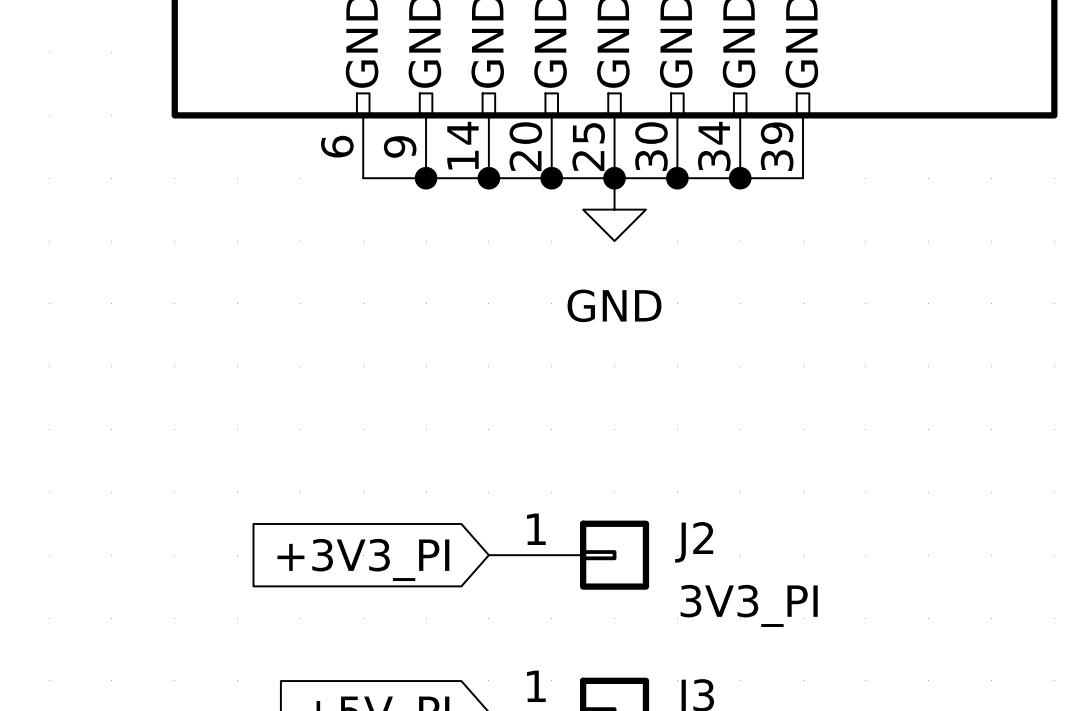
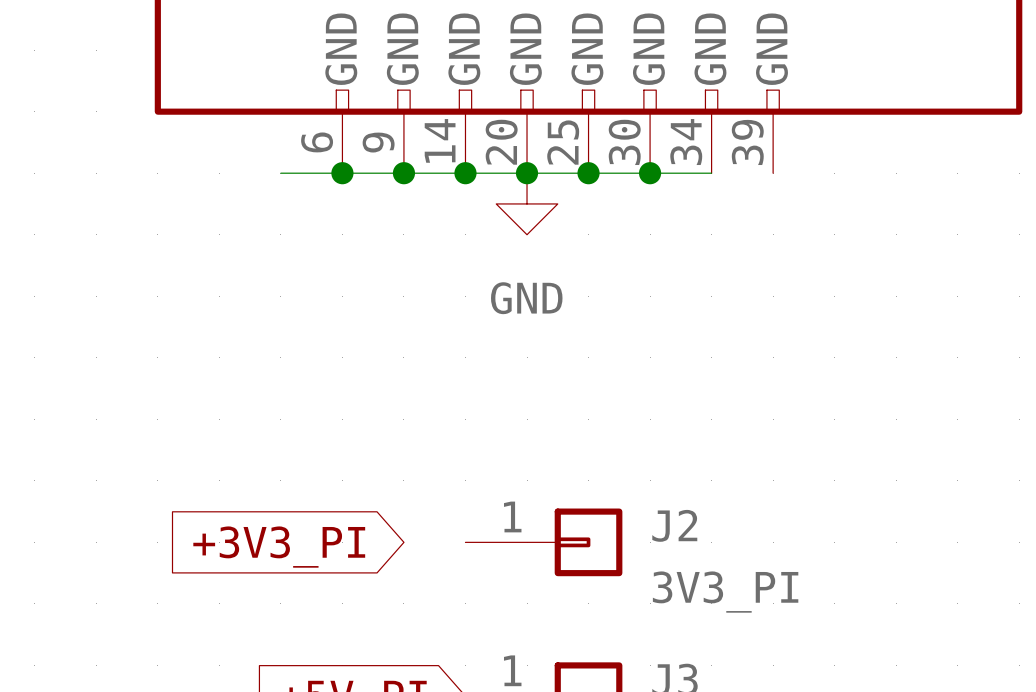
junction: none -> (342, 173)
wire: (740, 178) (803, 178) -> (280, 173) (342, 173)
junction: (740, 178) -> none
power symbol position: GND (614, 209) -> GND (527, 203)
global label position: +3V3_PI (363, 559) -> +3V3_PI (279, 547)

